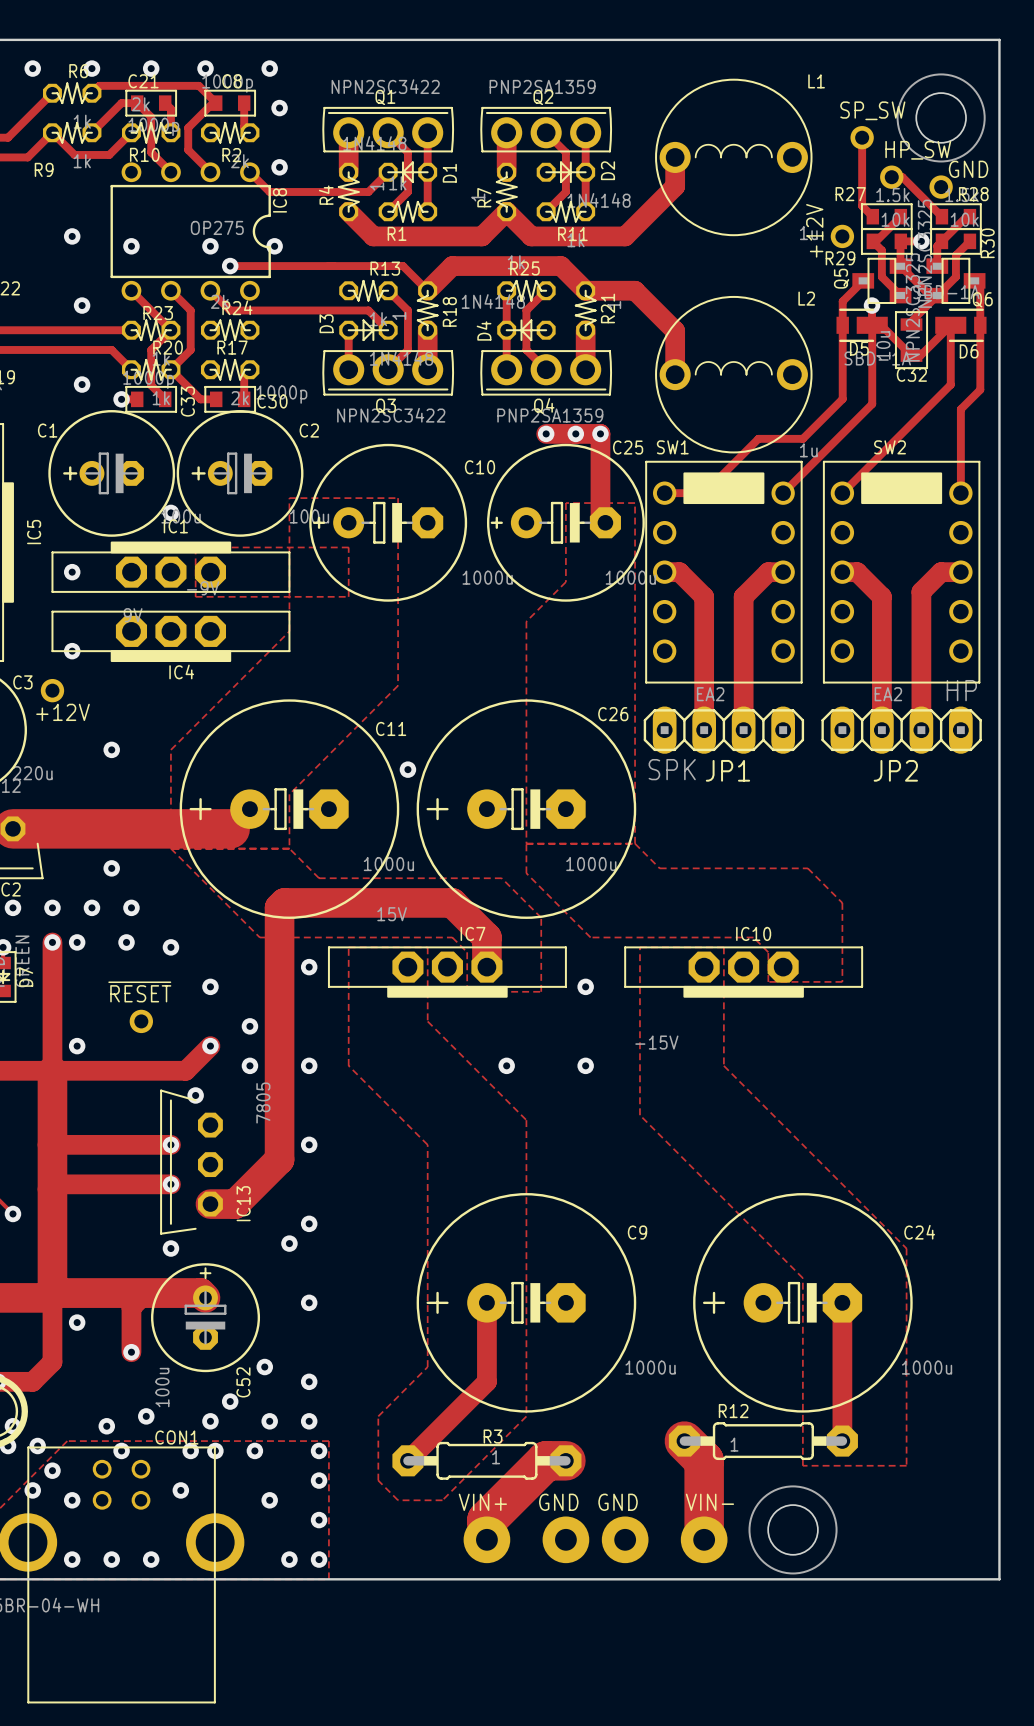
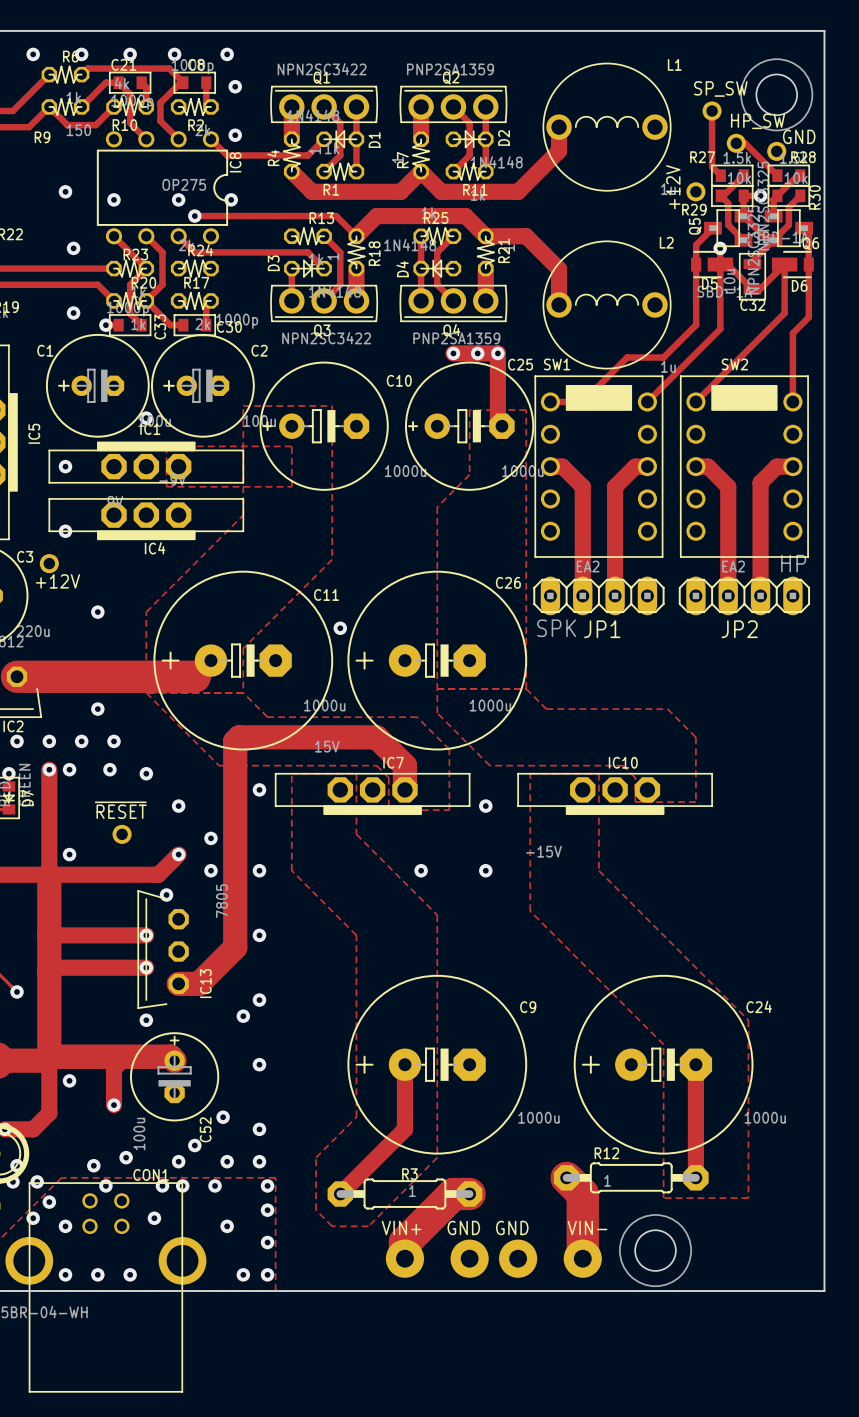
R10 value: 2k (140, 104) -> 4k (121, 83)
R9 value: 1k (82, 161) -> 150 (78, 130)

